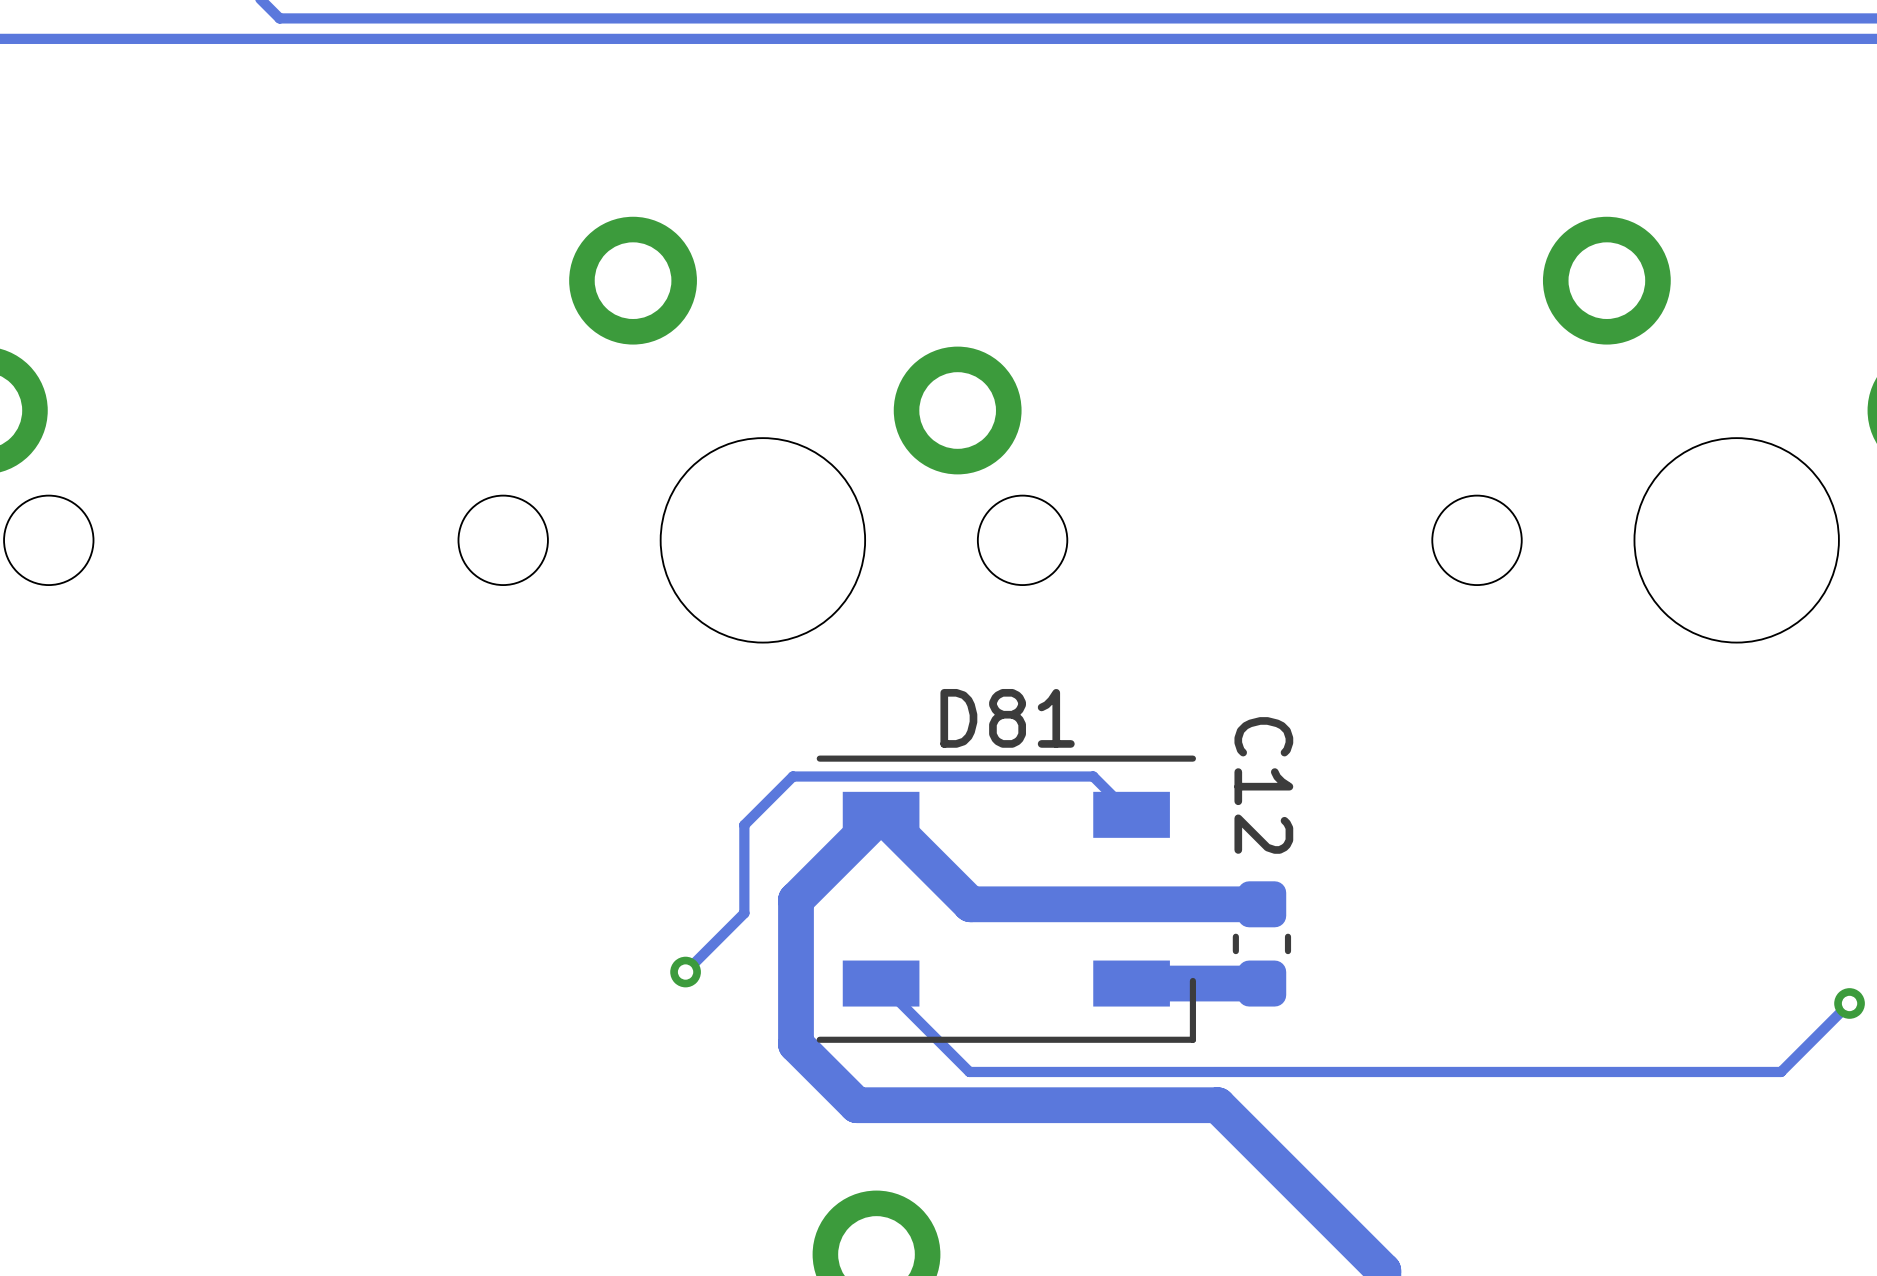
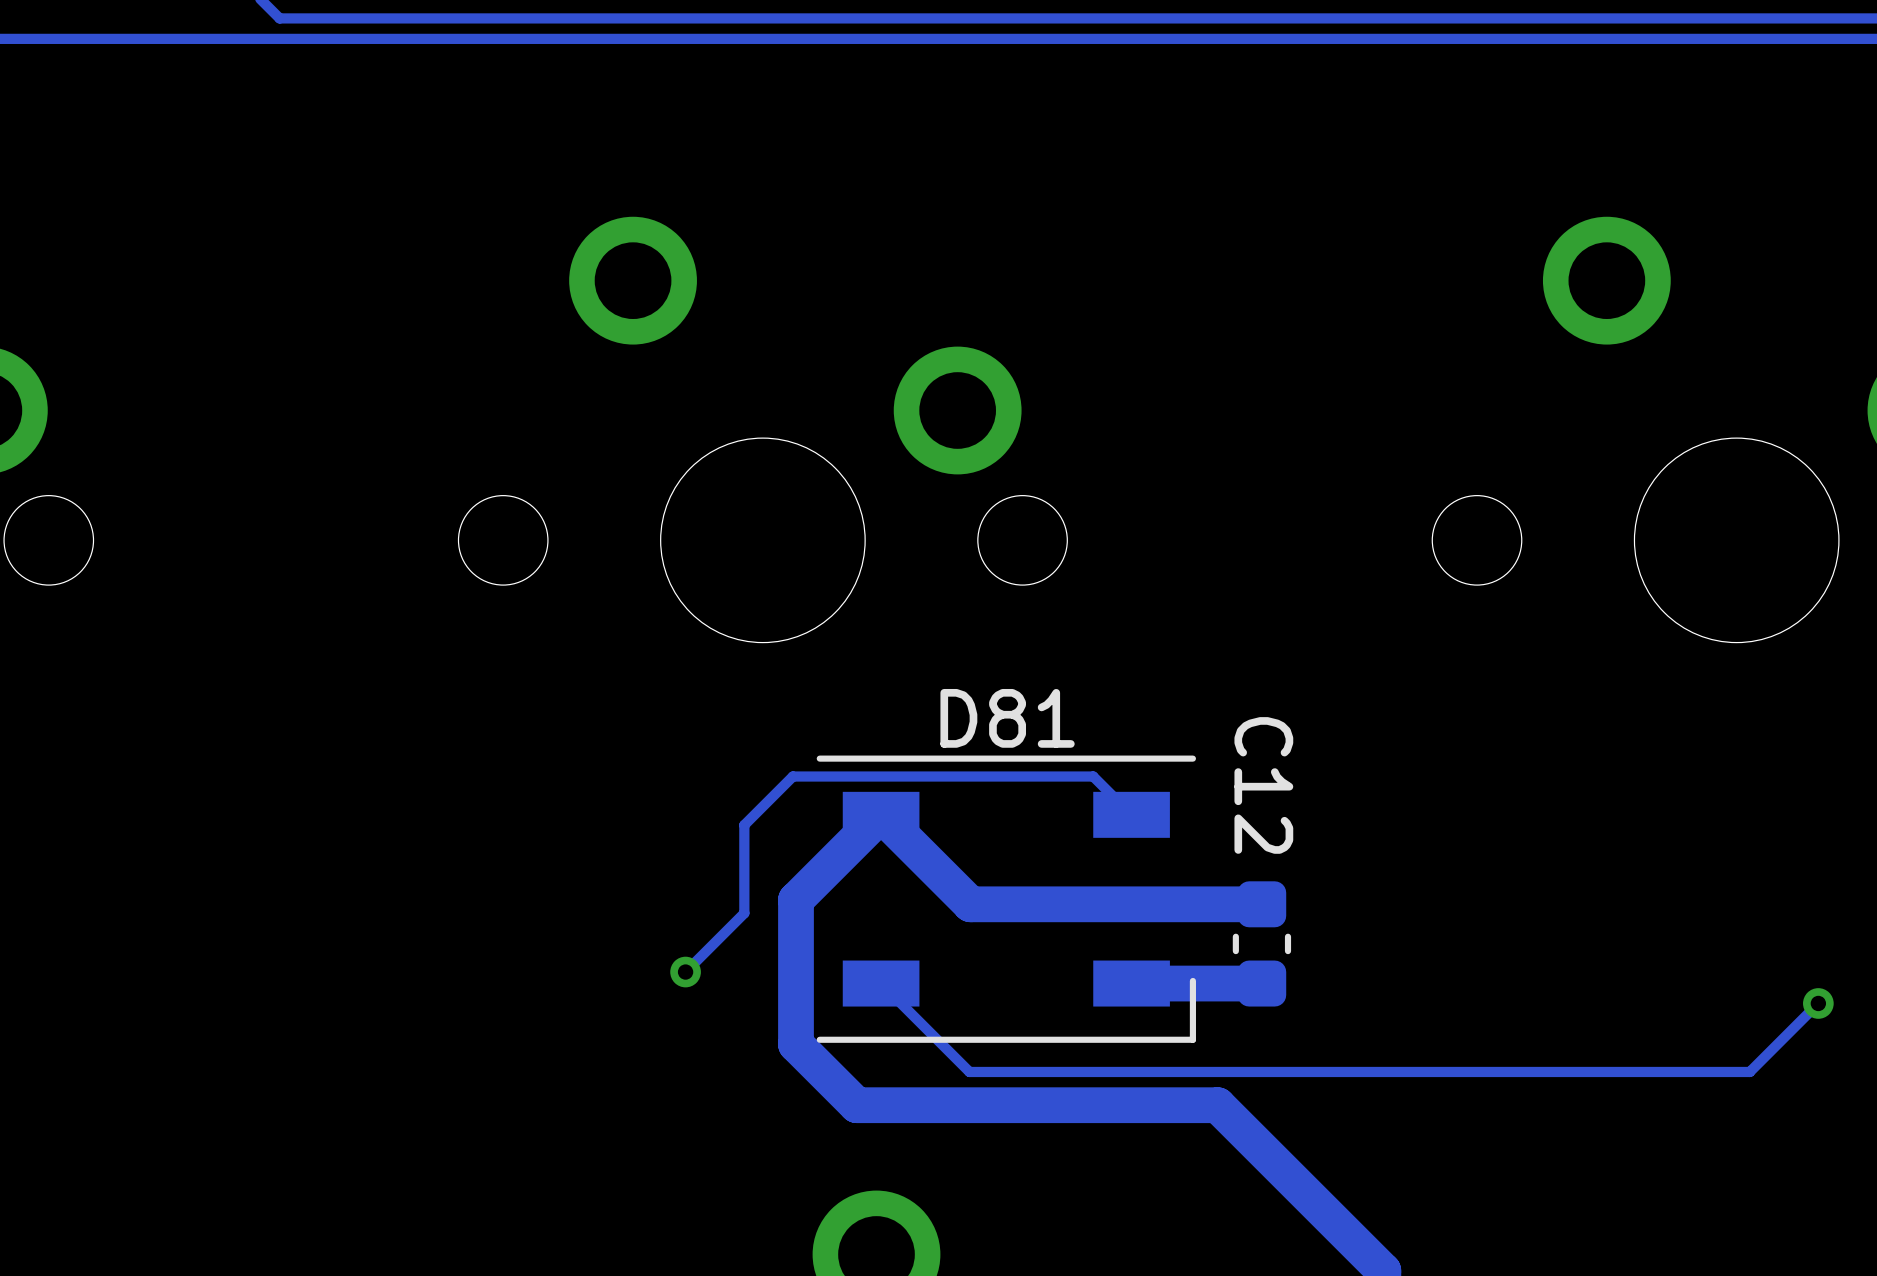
track: (1849, 1003) (1781, 1071) (1749, 1071) -> (1818, 1003) (1749, 1071)
via position: (1849, 1003) -> (1818, 1003)

